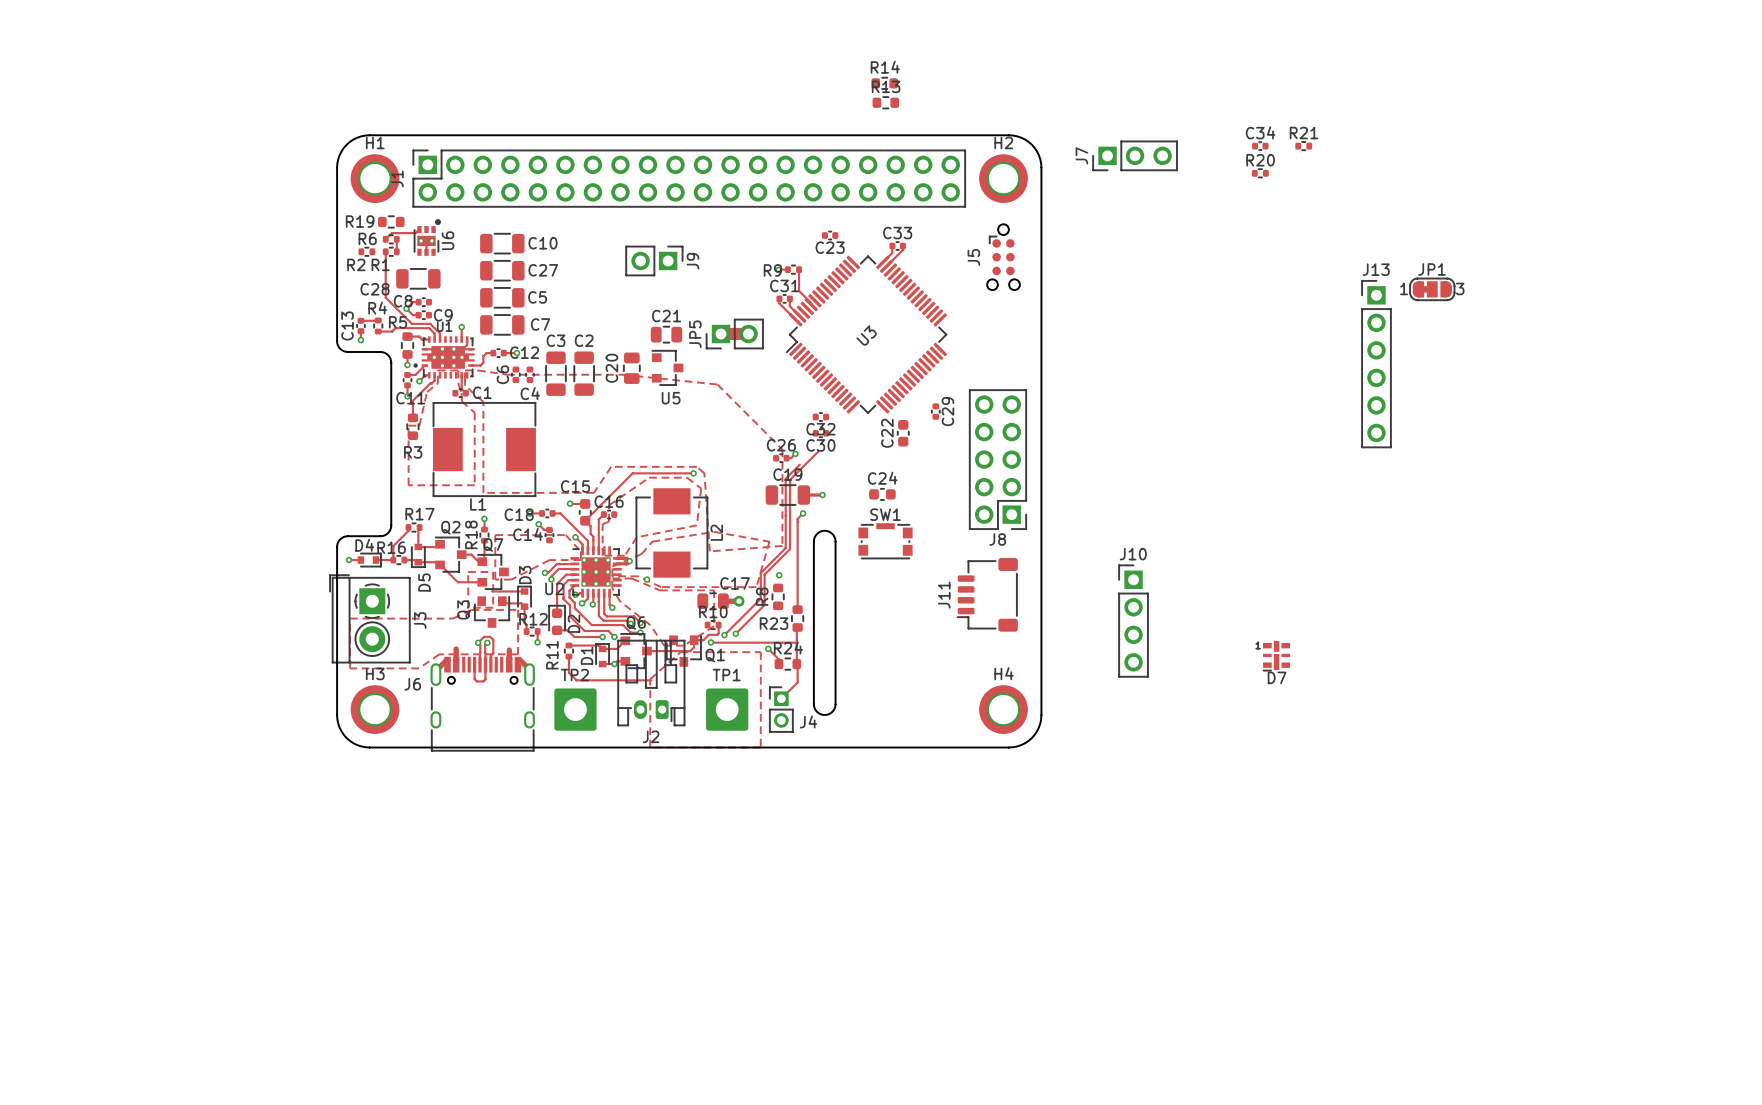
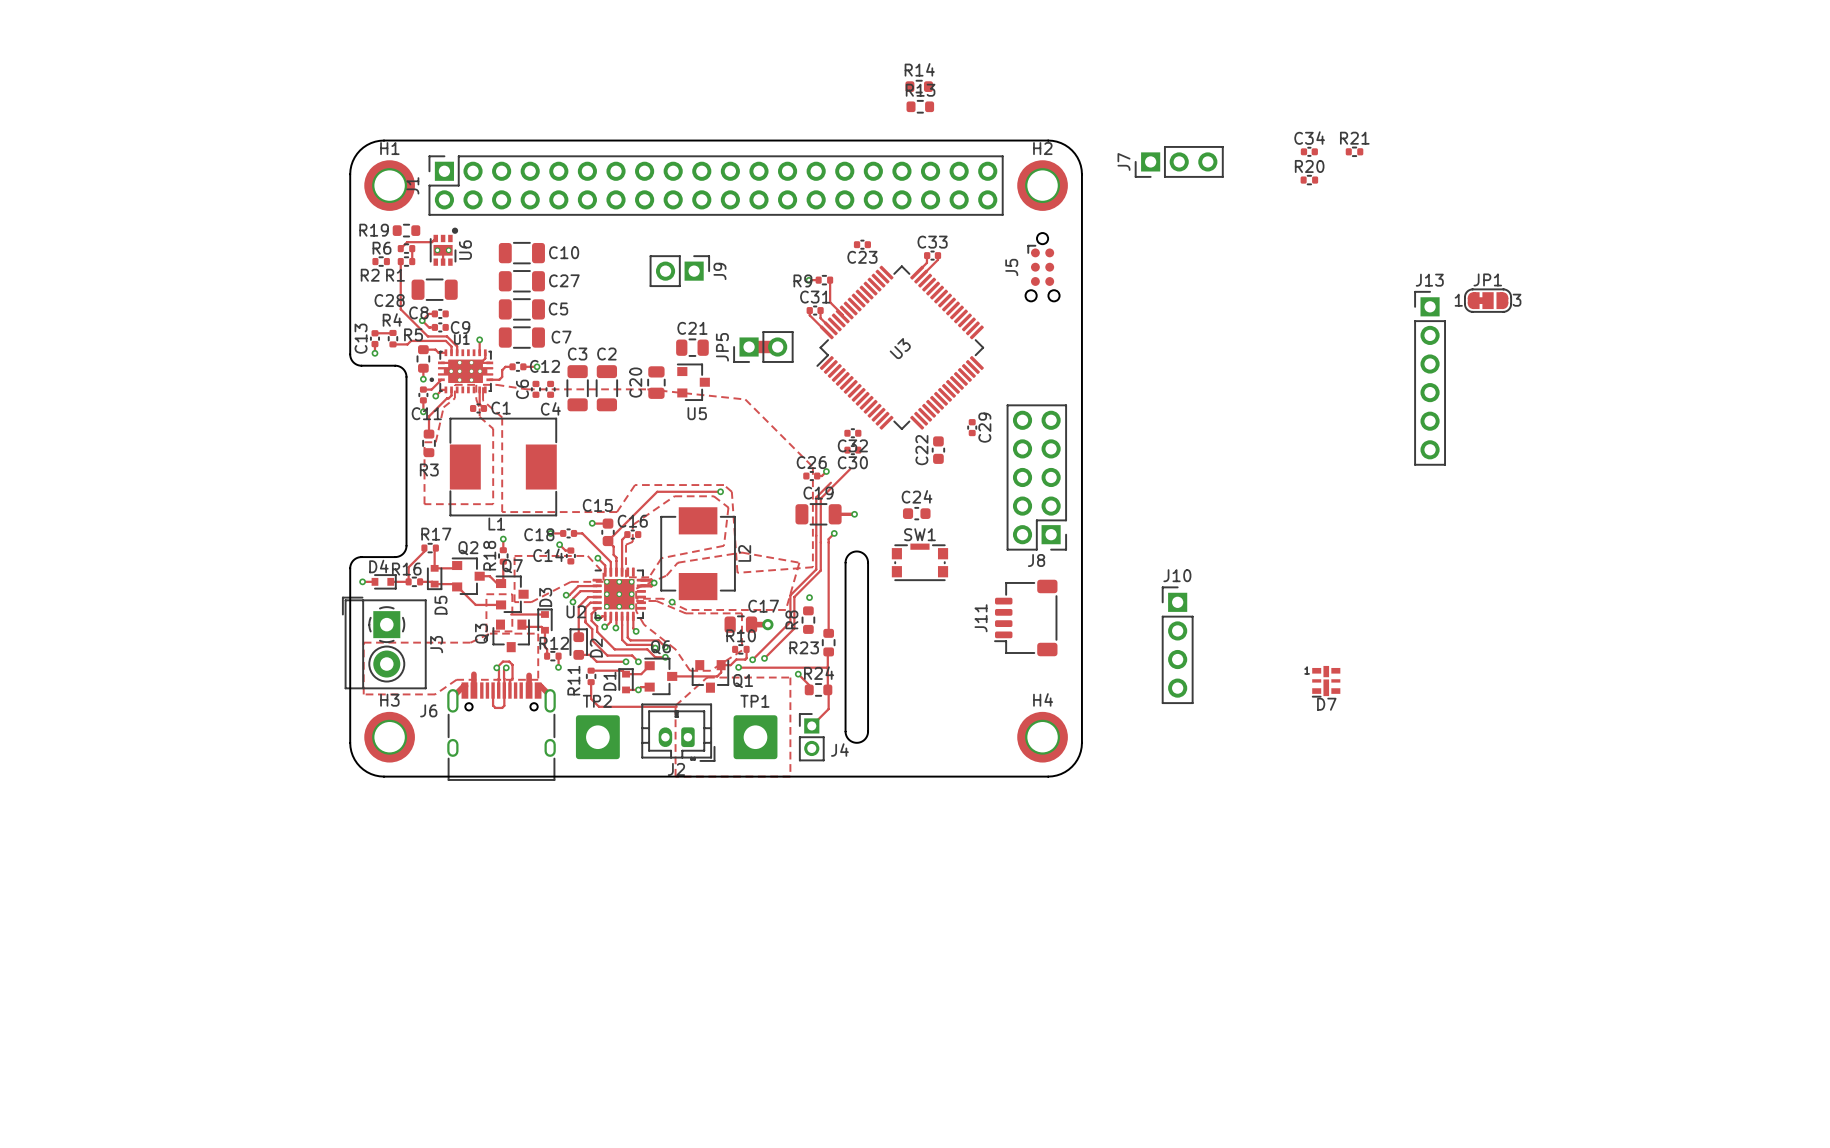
J2 footprint: [617, 640, 686, 727] -> [641, 703, 716, 762]

